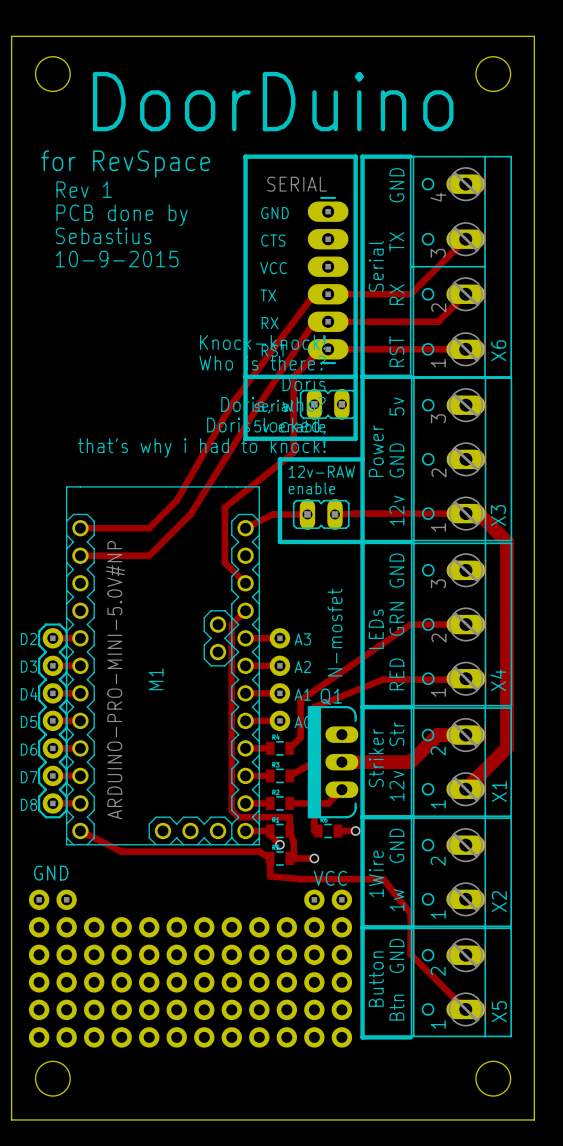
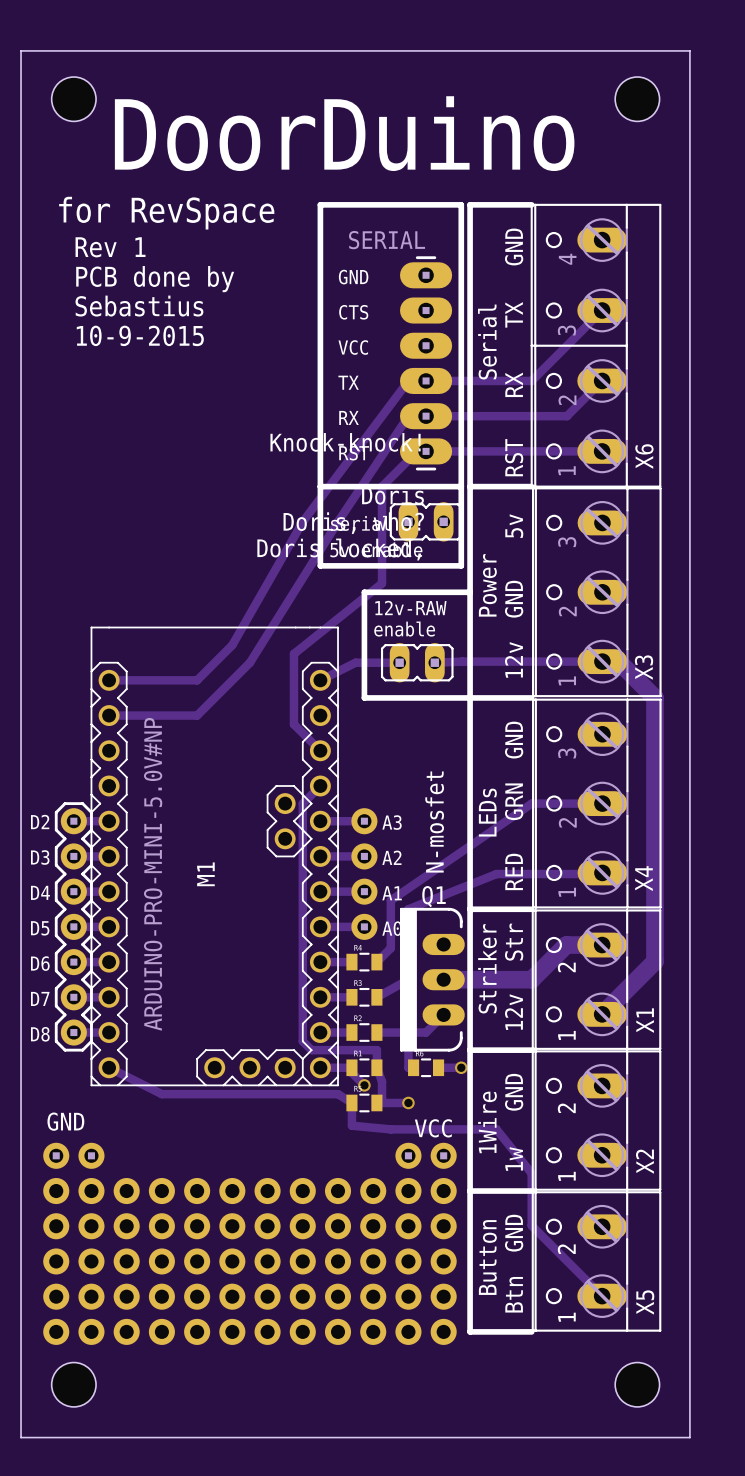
text: Who is there? (262, 363) -> none
text: that's why i had to knock! (201, 447) -> none

